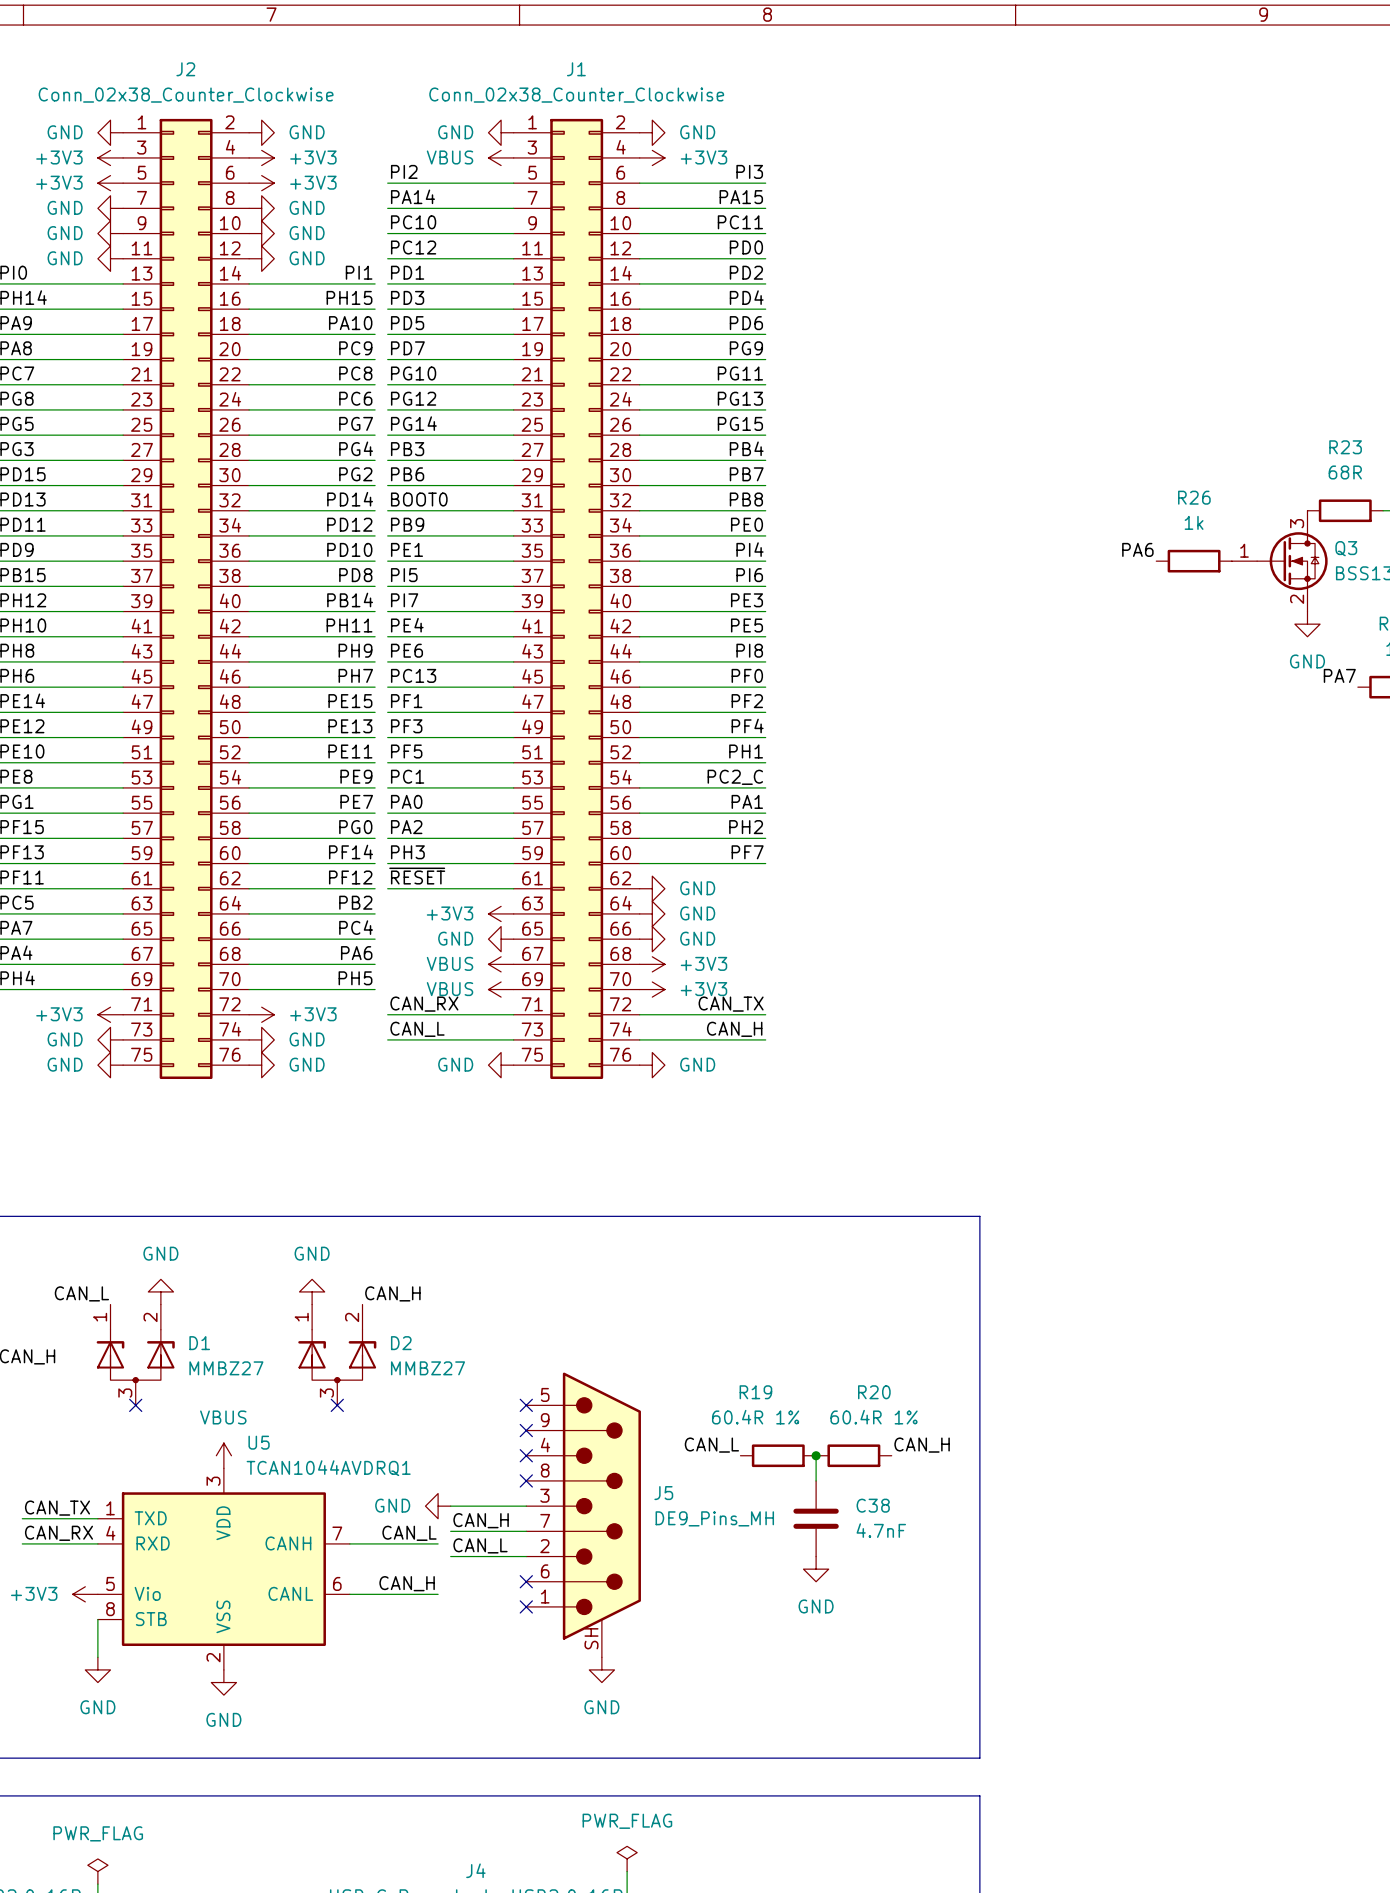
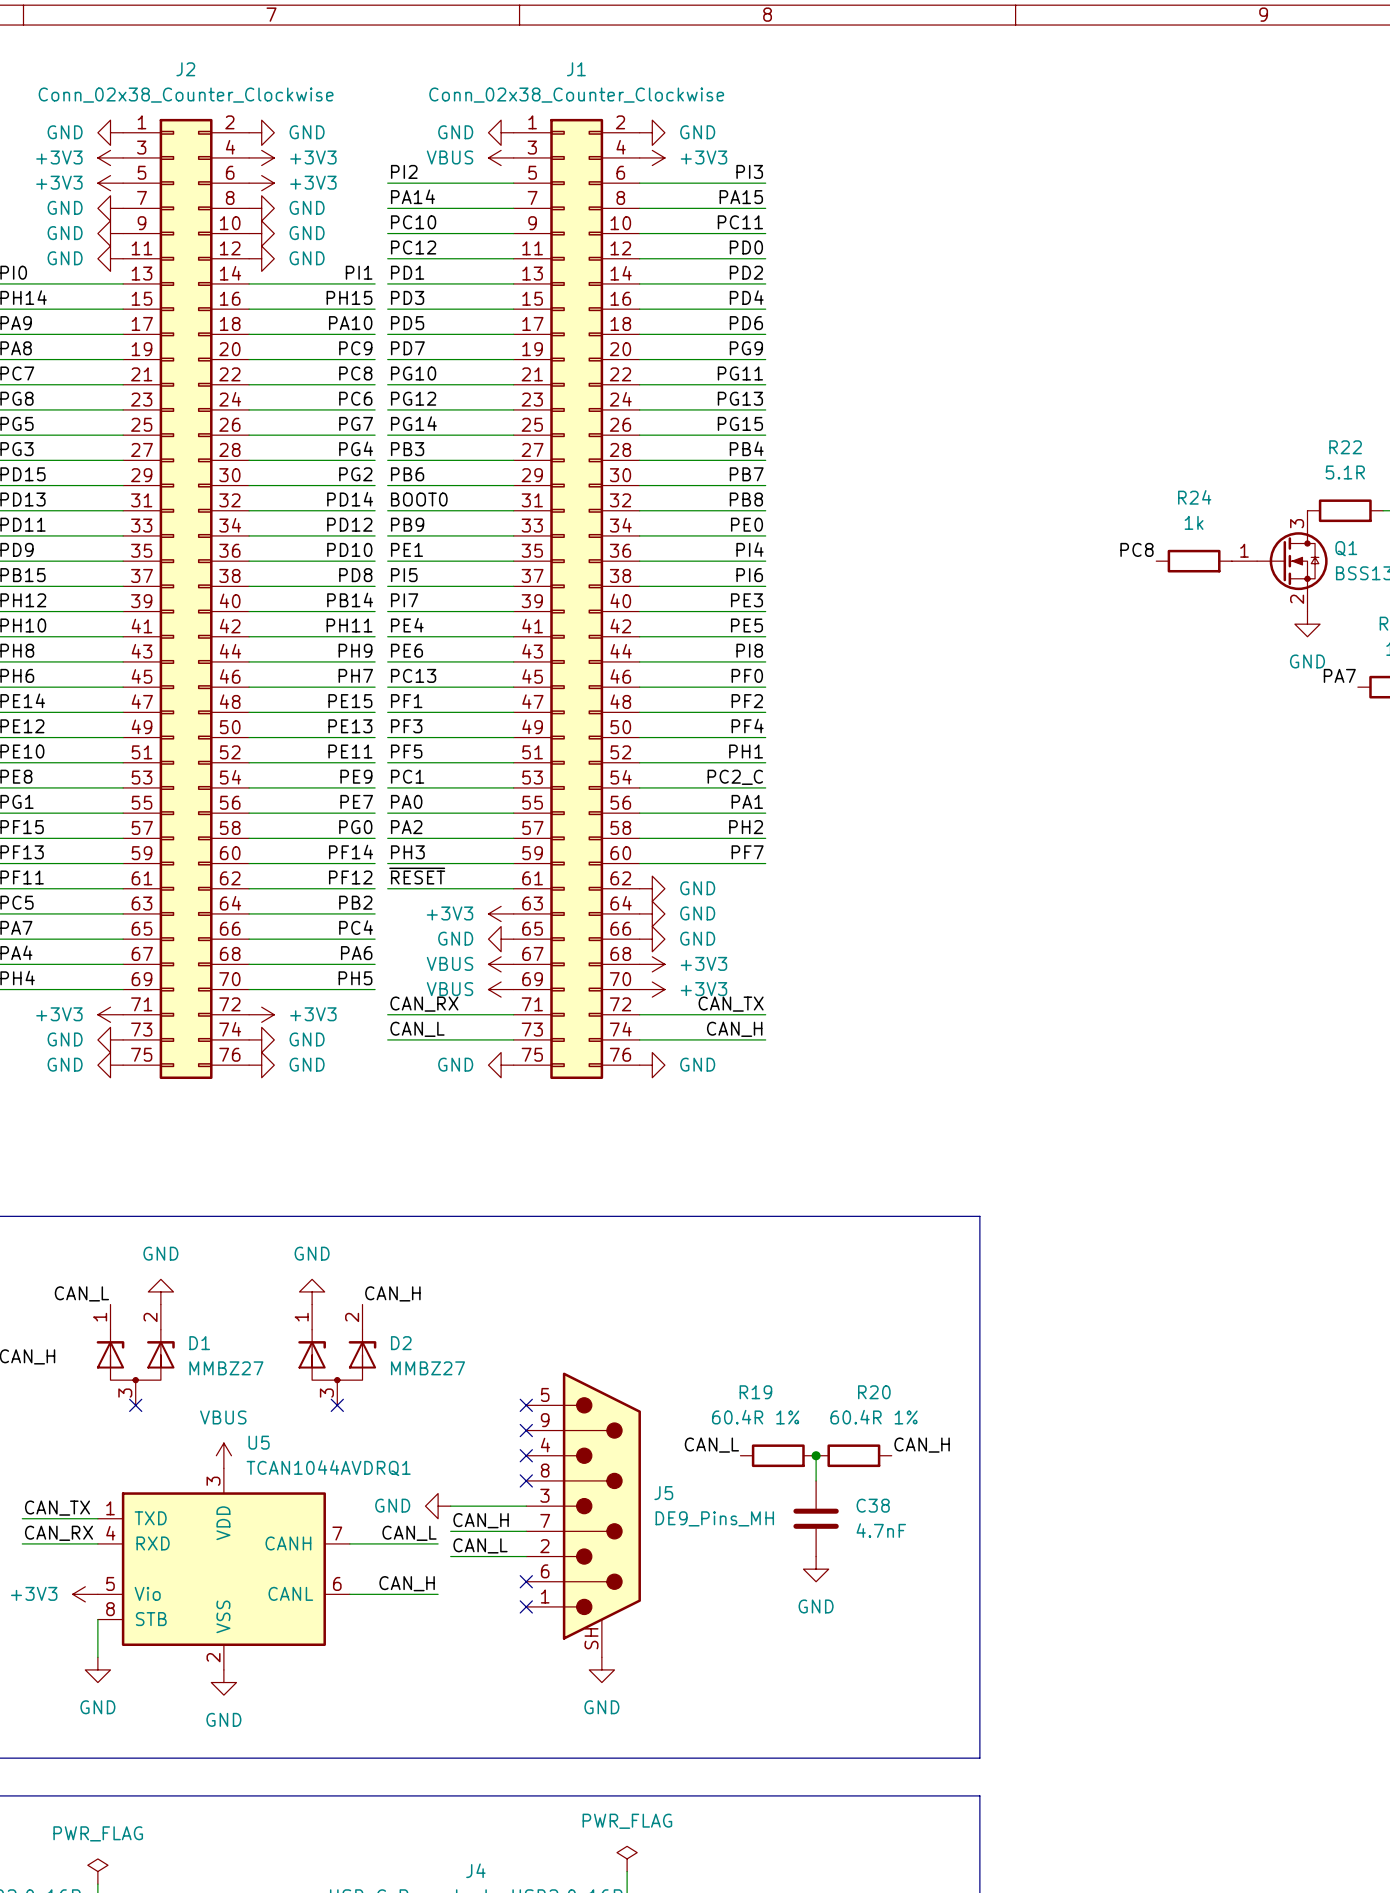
R23 name: R23 (1345, 447) -> R22 (1345, 447)
R23 value: 68R (1345, 472) -> 5.1R (1345, 472)
R26 name: R26 (1194, 497) -> R24 (1194, 497)
Q3 name: Q3 (1346, 548) -> Q1 (1346, 548)
label: PA6 (1137, 549) -> PC8 (1136, 549)

